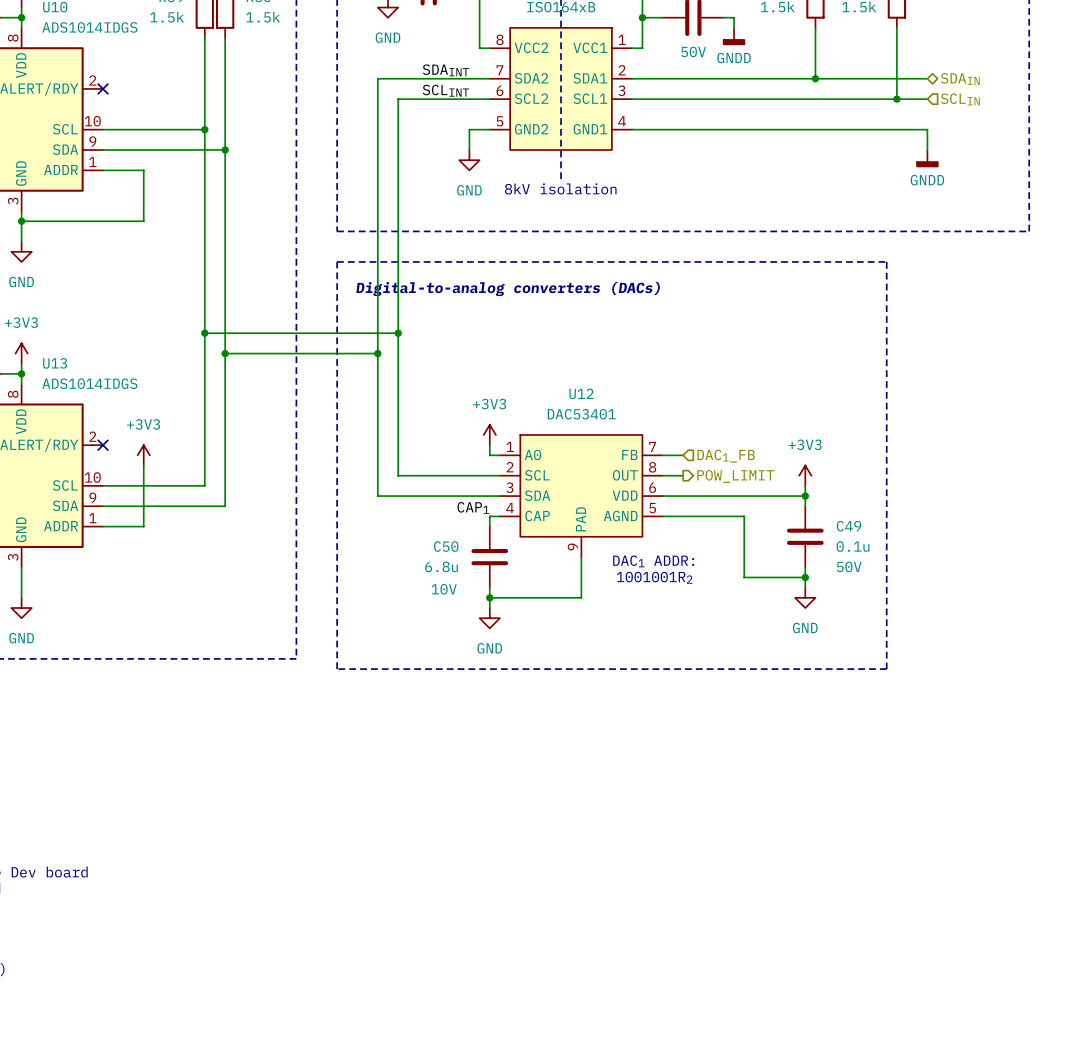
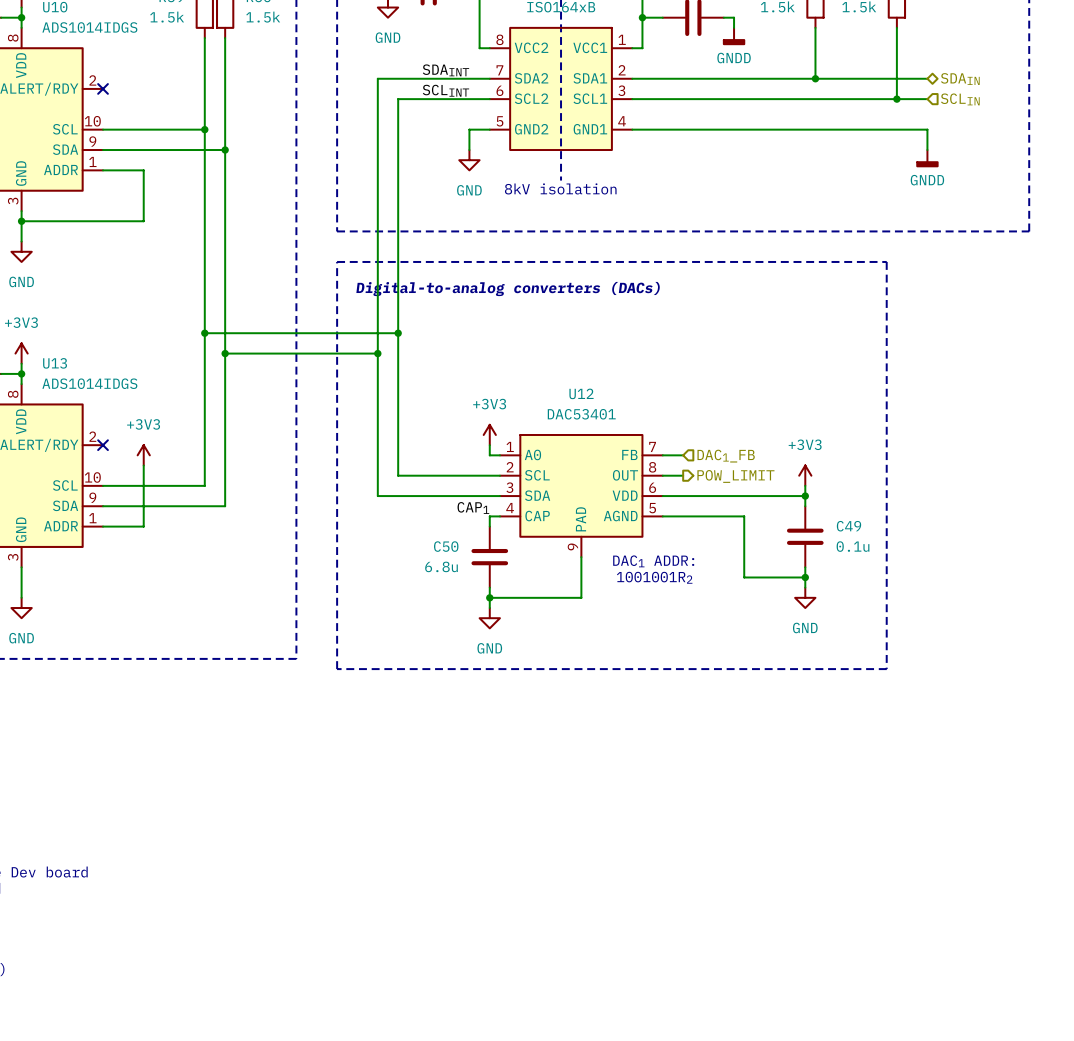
part text: 50V (693, 51) -> none
C49 text: 50V (849, 566) -> none
C50 text: 10V (444, 589) -> none

